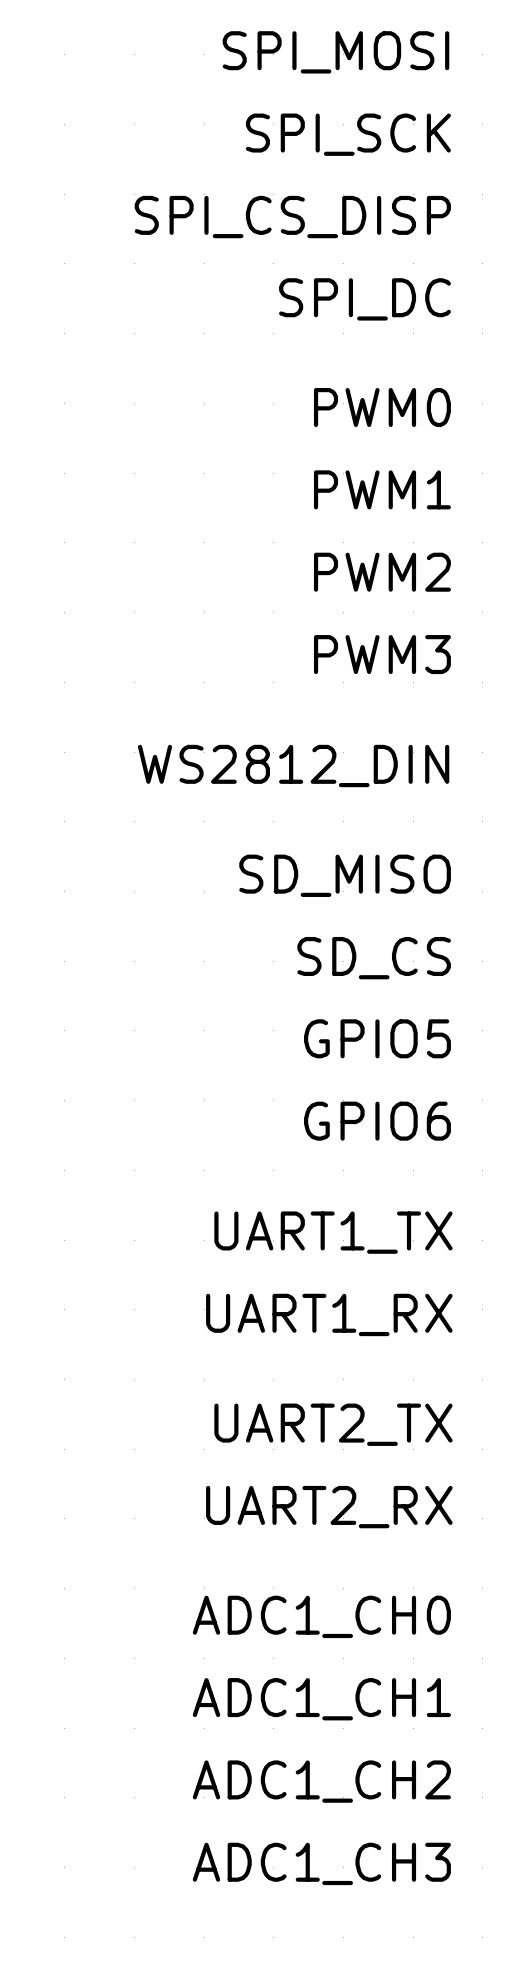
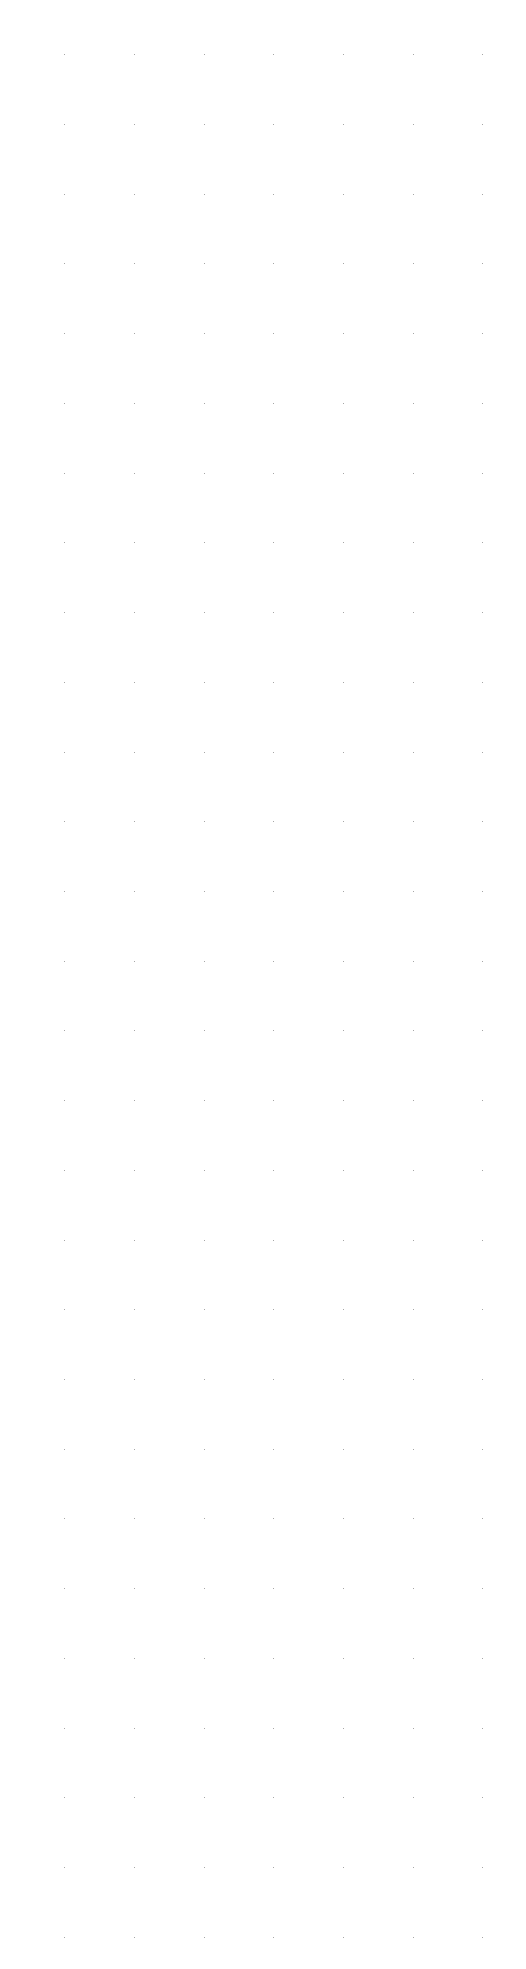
label: SPI_MOSI (335, 52) -> none
label: SPI_SCK (348, 134) -> none
label: SPI_CS_DISP (292, 217) -> none
label: SPI_DC (365, 299) -> none
label: PWM0 (382, 407) -> none
label: PWM1 (382, 489) -> none
label: PWM2 (382, 572) -> none
label: PWM3 (382, 654) -> none
label: WS2812_DIN (293, 766) -> none
label: SD_MISO (345, 875) -> none
label: SD_CS (374, 958) -> none
label: GPIO5 (377, 1038) -> none
label: GPIO6 (377, 1121) -> none
label: UART1_TX (333, 1232) -> none
label: UART1_RX (329, 1314) -> none
label: UART2_TX (333, 1424) -> none
label: UART2_RX (329, 1507) -> none
label: ADC1_CH0 (321, 1616) -> none
label: ADC1_CH1 (321, 1699) -> none
label: ADC1_CH2 (321, 1781) -> none
label: ADC1_CH3 (321, 1863) -> none

